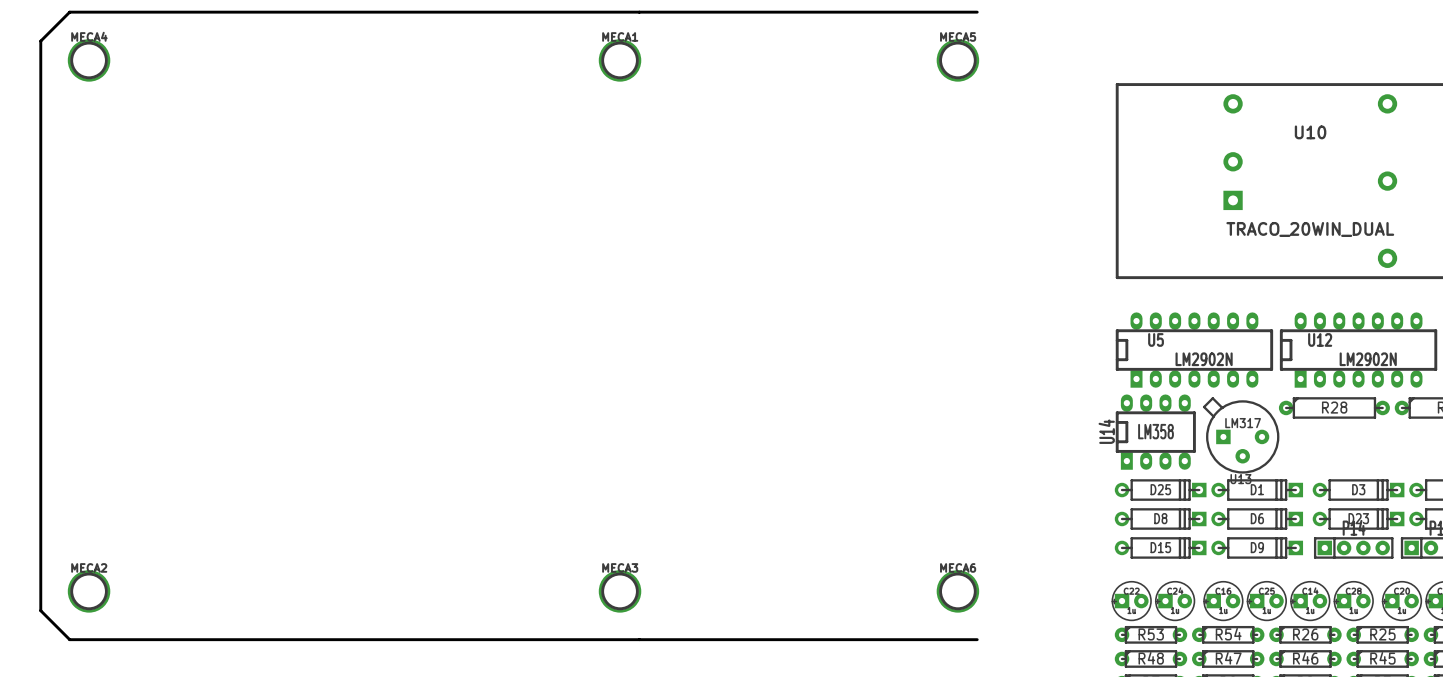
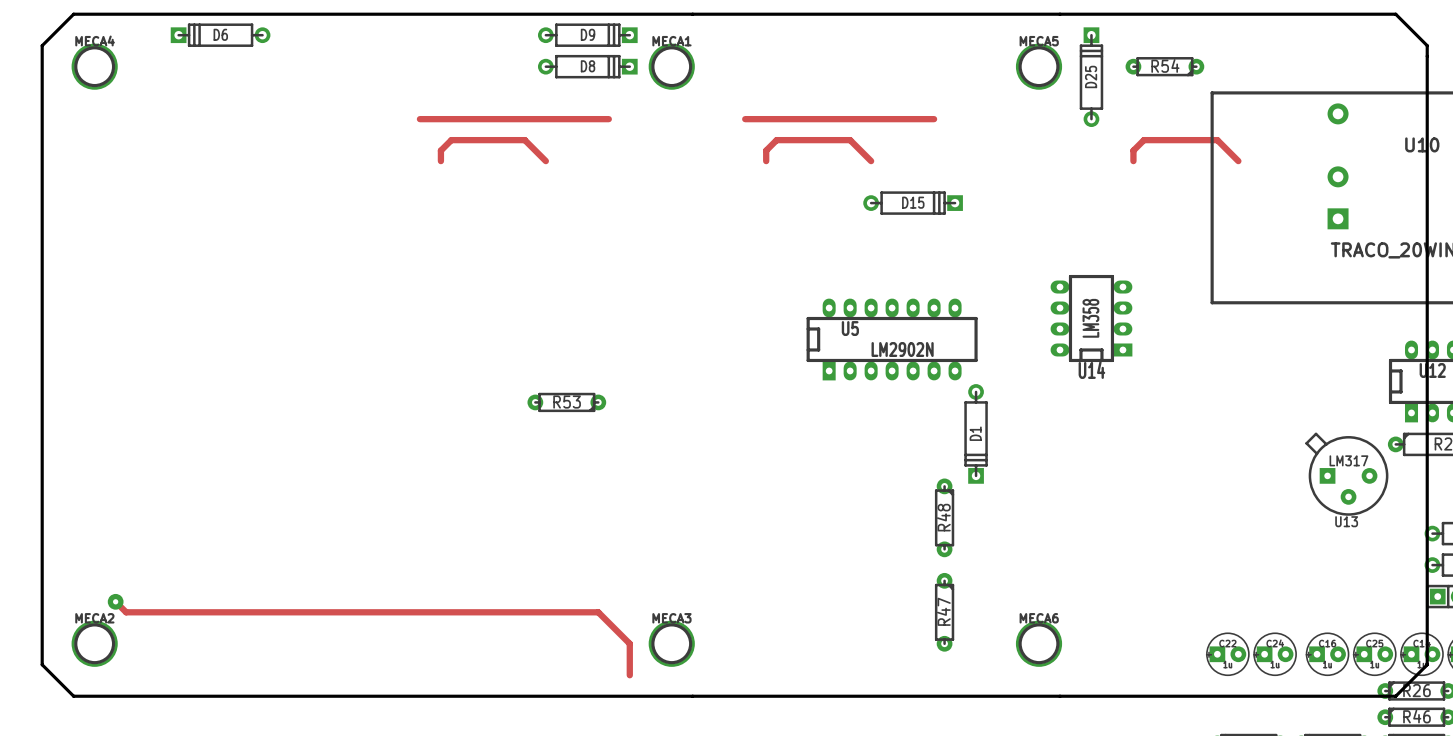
board edge: none -> (1059, 14) (1395, 14) (1427, 45) (1427, 664) (1395, 696) (1059, 696)
track: none -> (419, 119) (608, 119)
track: none -> (745, 119) (934, 119)
track: none -> (440, 161) (440, 150) (451, 140) (524, 140) (545, 161)
track: none -> (766, 161) (766, 150) (776, 140) (850, 140) (871, 161)
track: none -> (1133, 161) (1133, 150) (1143, 140) (1217, 140) (1238, 161)
U5 position: (1194, 350) -> (892, 339)
U14 rotation: 0° (1155, 432) -> 90° counterclockwise (1091, 318)
U14 position: (1155, 432) -> (1091, 318)
D25 rotation: 0° (1160, 490) -> 90° counterclockwise (1091, 77)
D25 position: (1160, 490) -> (1091, 77)
D1 rotation: 0° (1257, 490) -> 90° clockwise (976, 433)
D1 position: (1257, 490) -> (976, 433)
D8 position: (1160, 518) -> (587, 66)
D6 rotation: 0° (1257, 518) -> 180° (220, 35)
D6 position: (1257, 518) -> (220, 35)
D15 position: (1160, 547) -> (913, 203)
D9 position: (1257, 547) -> (587, 35)
track: none -> (115, 601) (126, 612) (598, 612) (629, 643) (629, 675)
via: none -> (115, 601)
R53 rotation: 0° (1150, 634) -> 180° (566, 402)
R53 position: (1150, 634) -> (566, 402)
R54 rotation: 0° (1228, 634) -> 180° (1164, 66)
R54 position: (1228, 634) -> (1164, 66)
R48 rotation: 0° (1150, 658) -> 90° clockwise (944, 517)
R48 position: (1150, 658) -> (944, 517)
R47 rotation: 0° (1228, 658) -> 90° clockwise (944, 612)
R47 position: (1228, 658) -> (944, 612)

